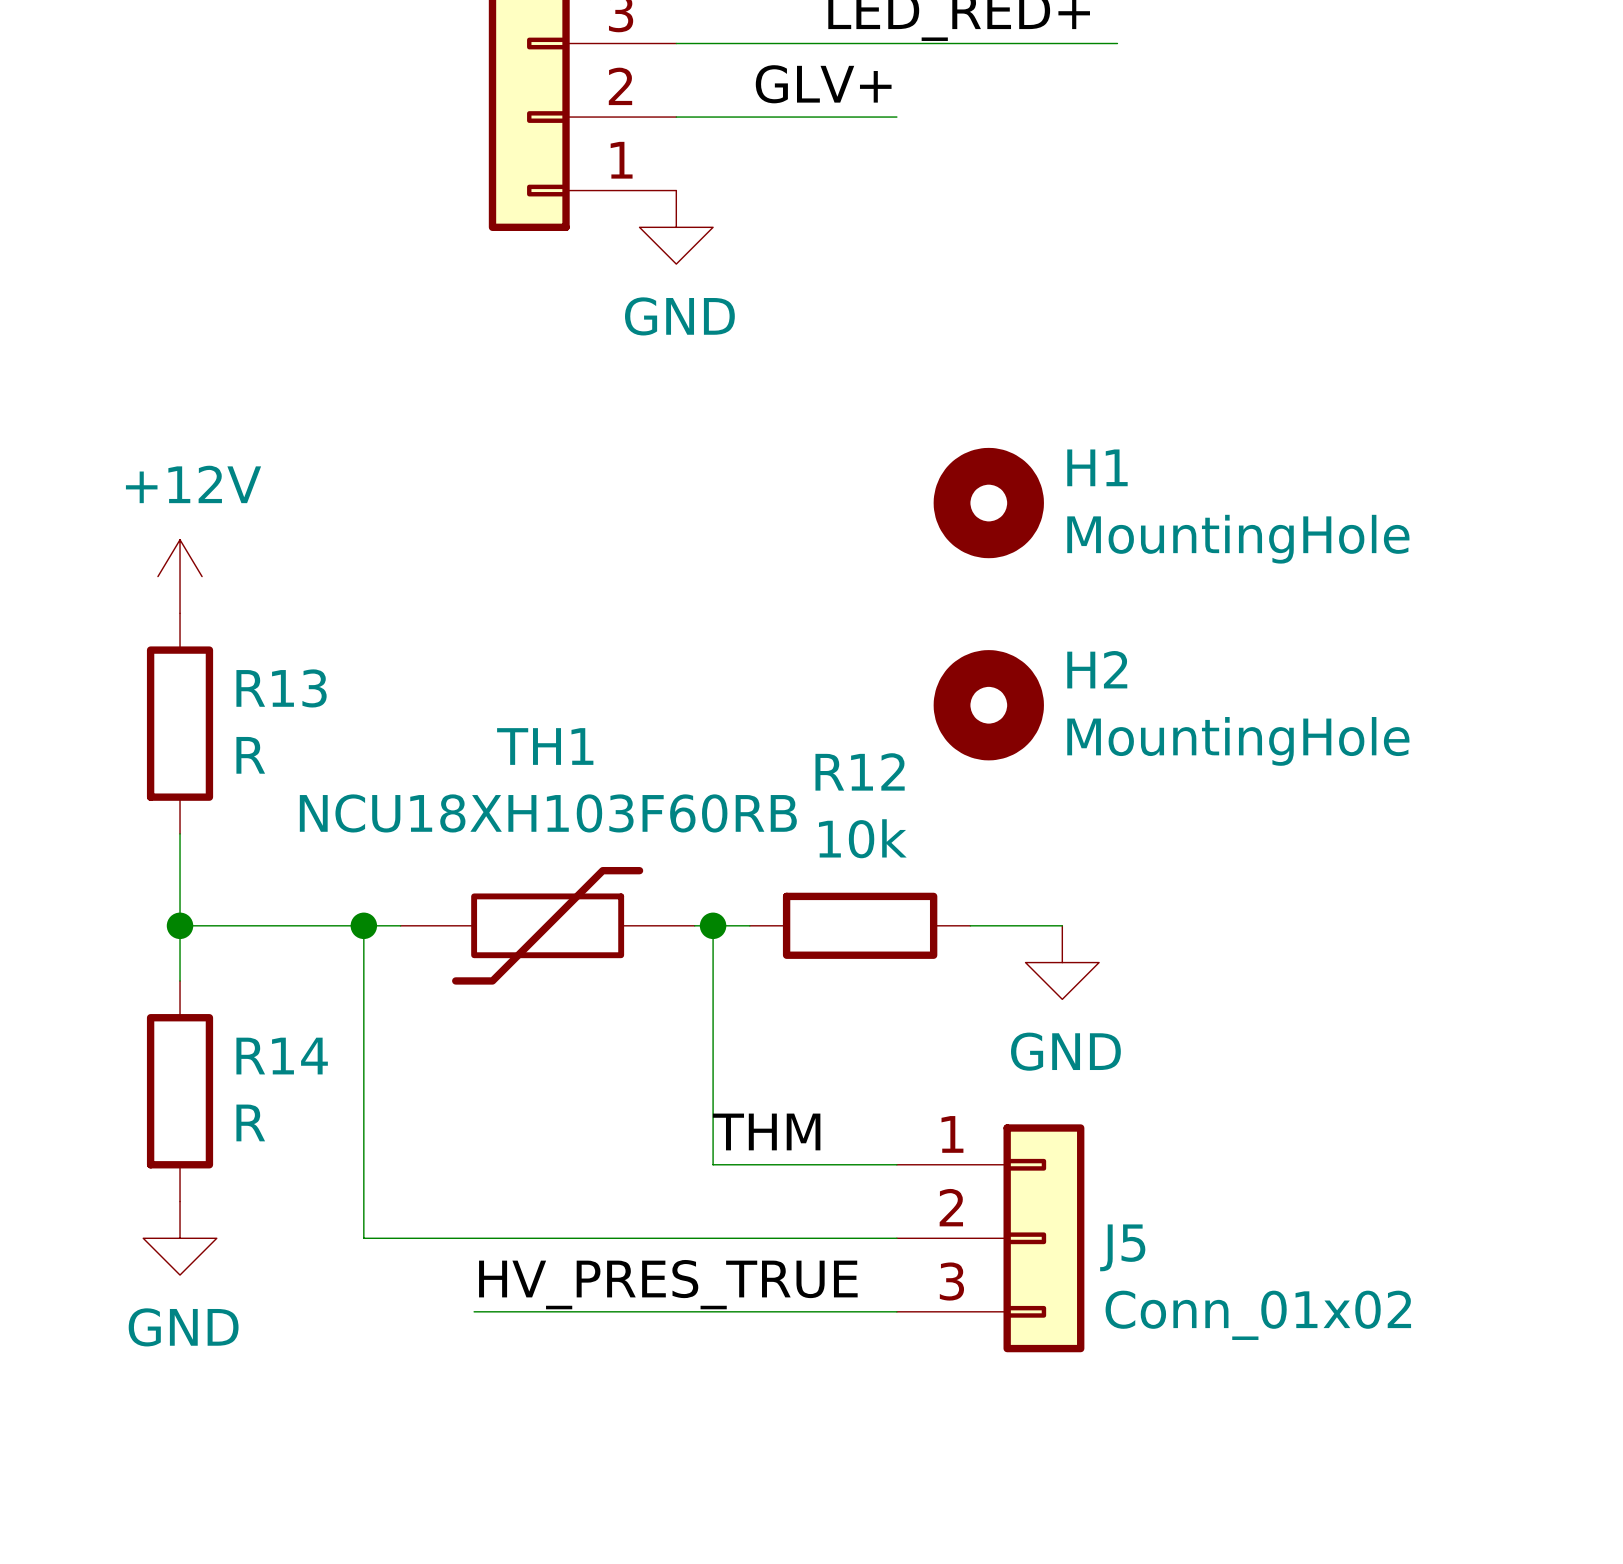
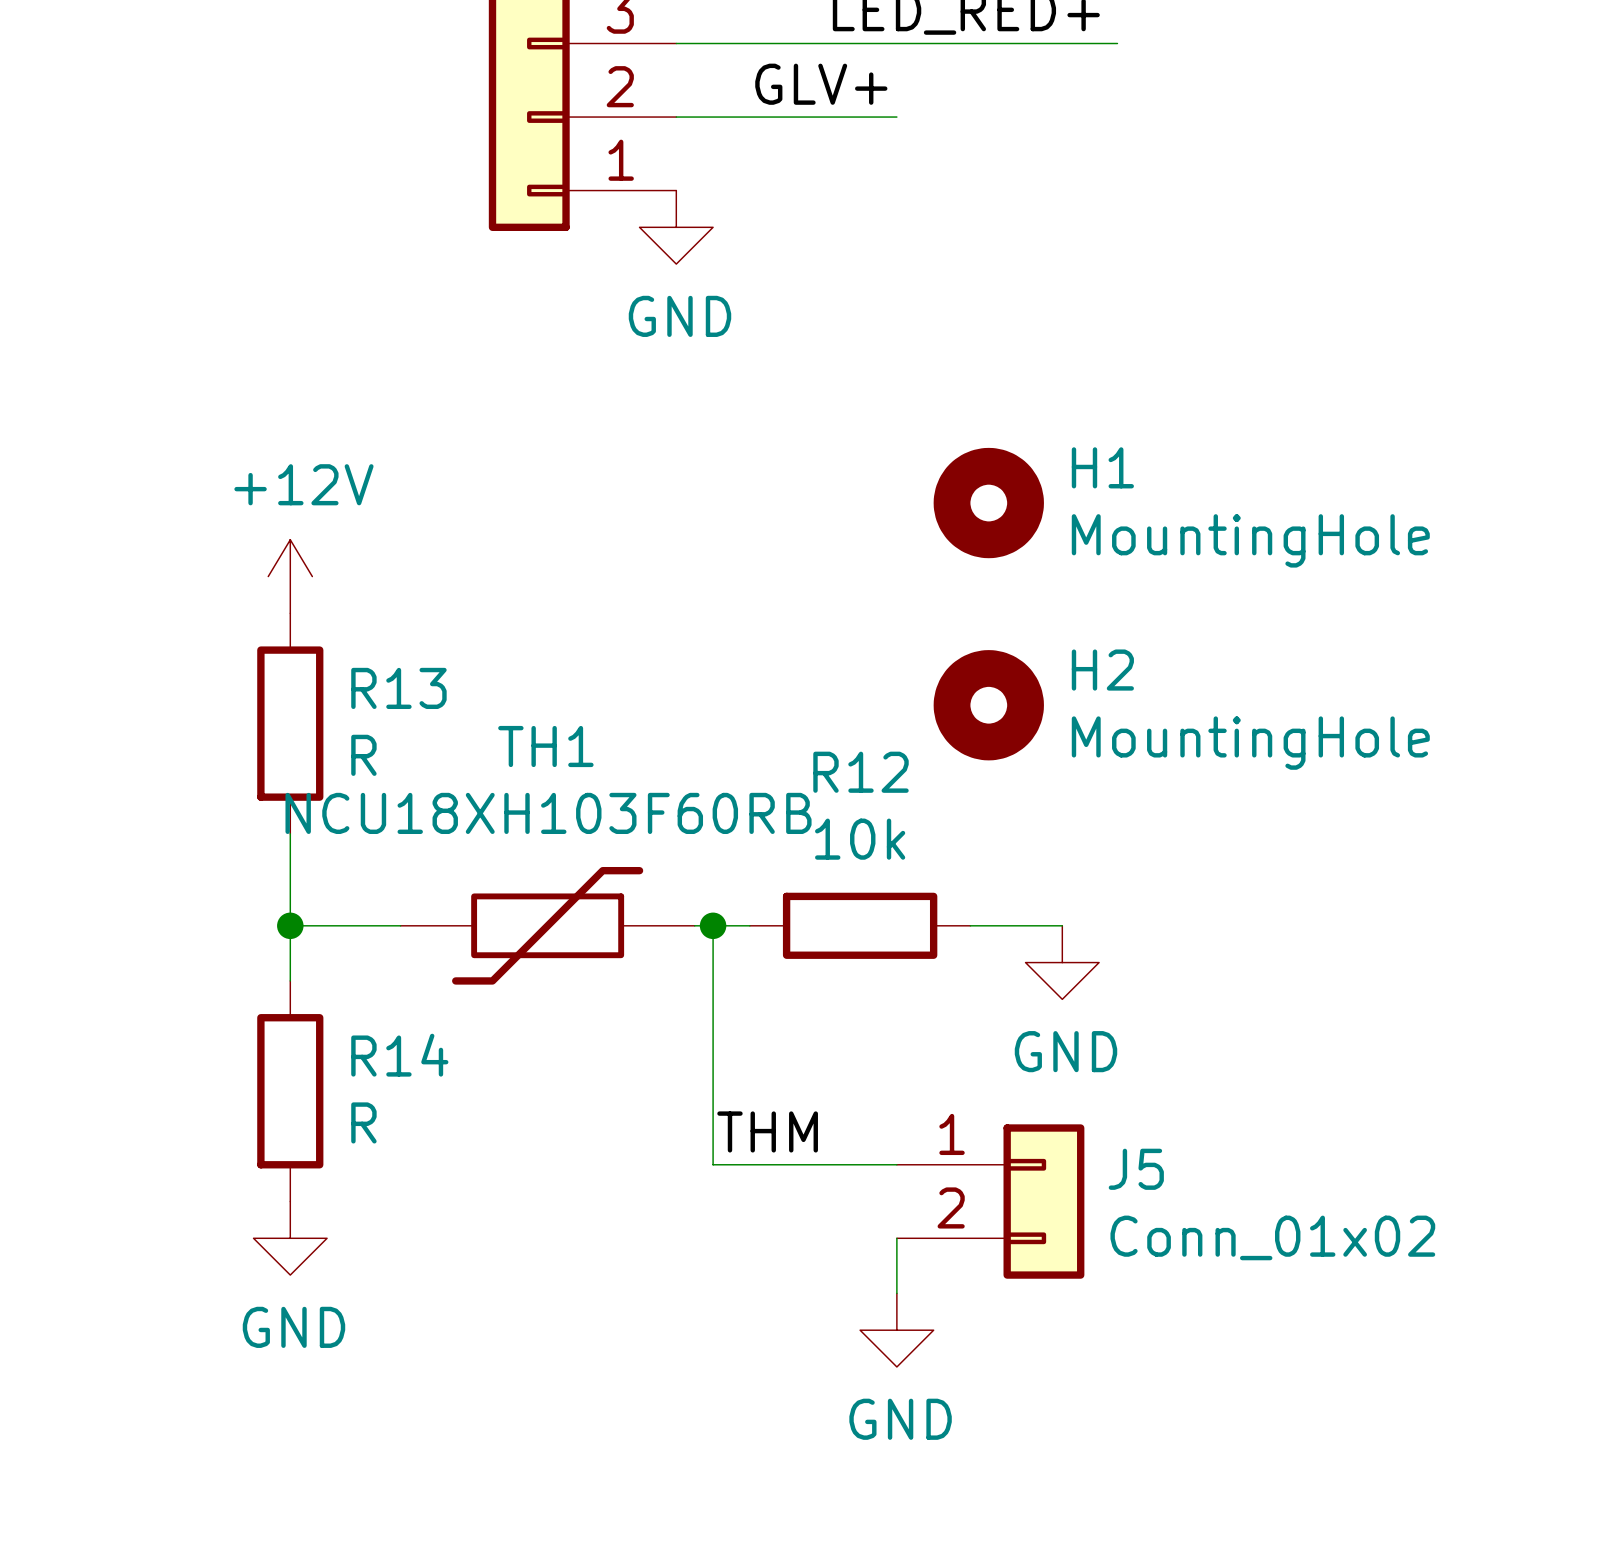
power symbol position: +12V (180, 576) -> +12V (290, 576)
R13 position: (180, 723) -> (290, 723)
wire: (180, 833) (180, 980) -> (290, 833) (290, 980)
wire: (180, 925) (290, 925) -> none
junction: (180, 925) -> none
junction: none -> (290, 925)
wire: (363, 925) (363, 1238) (896, 1238) -> (896, 1293) (896, 1238)
junction: (363, 925) -> none
R14 position: (180, 1091) -> (290, 1091)
J5 symbol: [896, 1124, 1085, 1353] -> [896, 1124, 1085, 1279]
power symbol position: GND (180, 1238) -> GND (290, 1238)
label: HV_PRES_TRUE (668, 1284) -> none
wire: (474, 1311) (896, 1311) -> none
power symbol: none -> GND (896, 1330)

